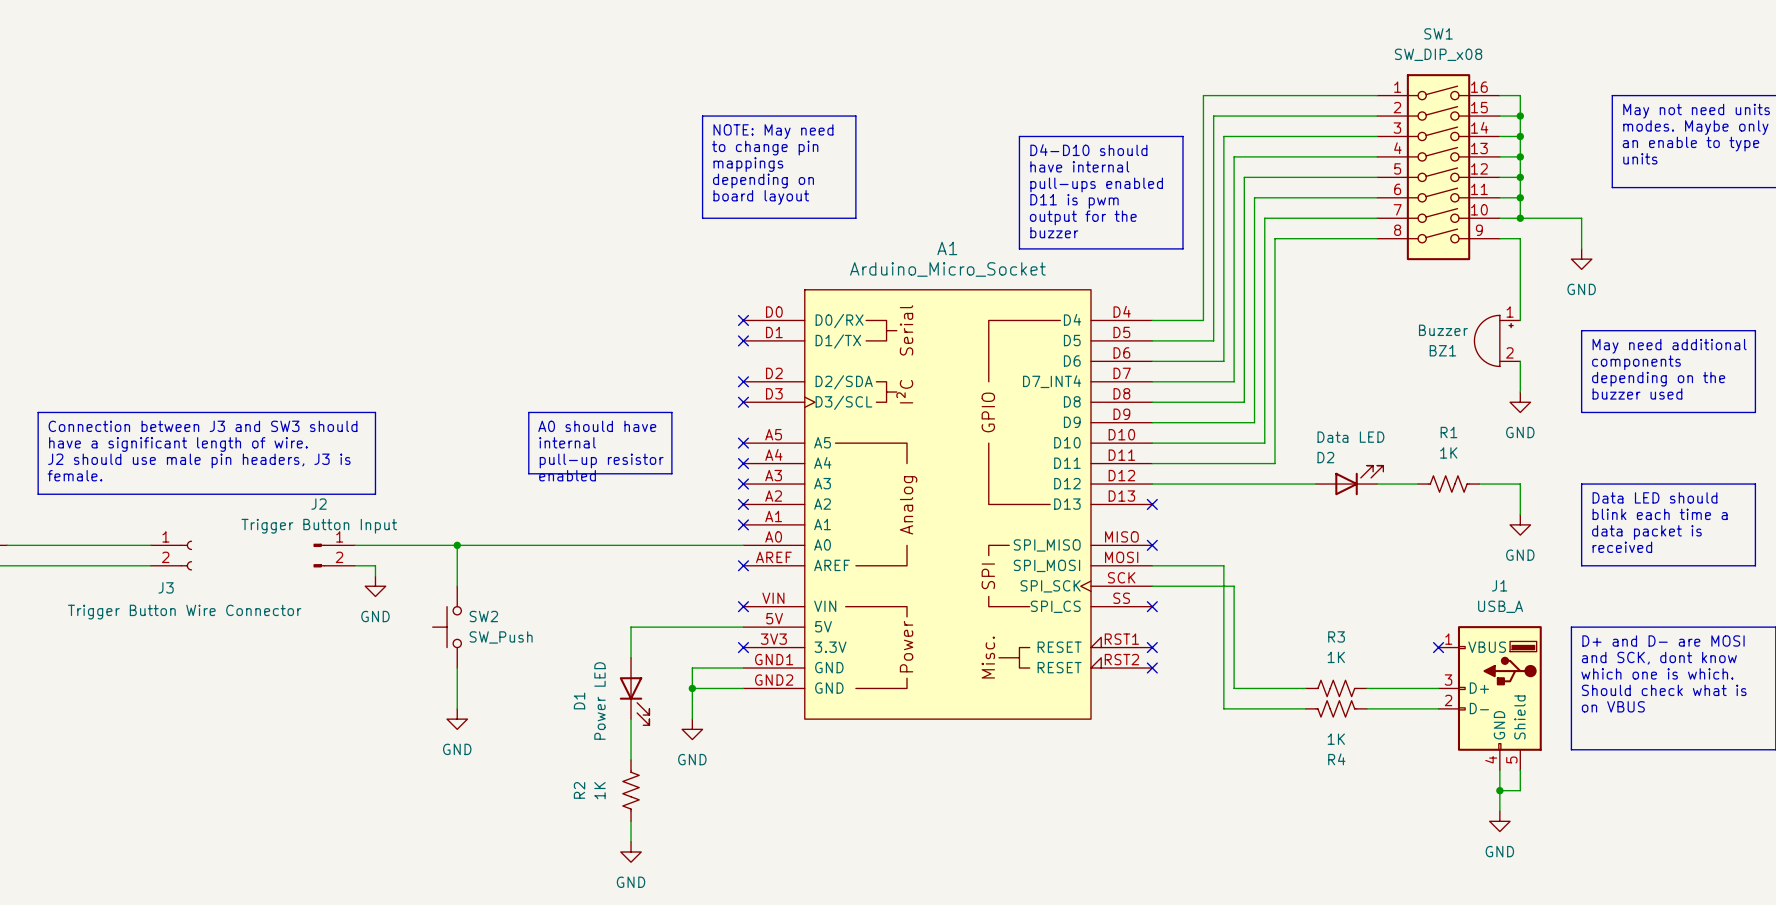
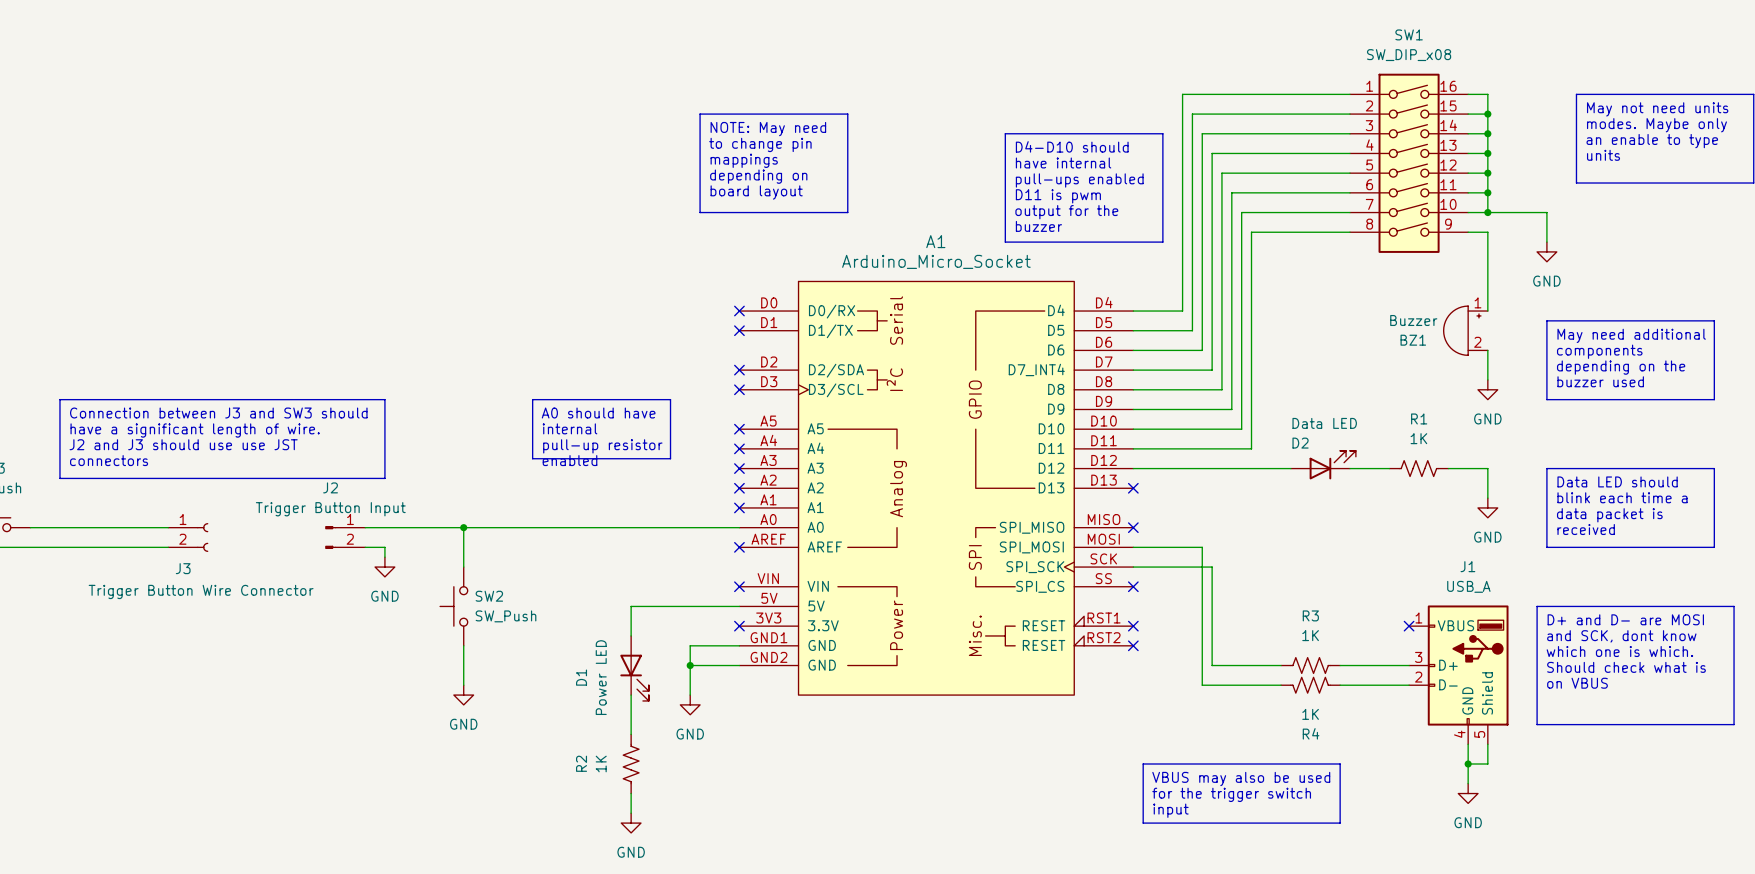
text: J2 should use male pin headers, J3 is (199, 460) -> J2 and J3 should use use JST (183, 444)
text: female. (74, 475) -> connectors (109, 460)
line: none -> (1143, 764) (1340, 764) (1340, 823) (1143, 823) (1143, 764)
text: none -> VBUS may also be used (1241, 779)
text: none -> for the trigger switch (1231, 794)
text: none -> input (1170, 810)

